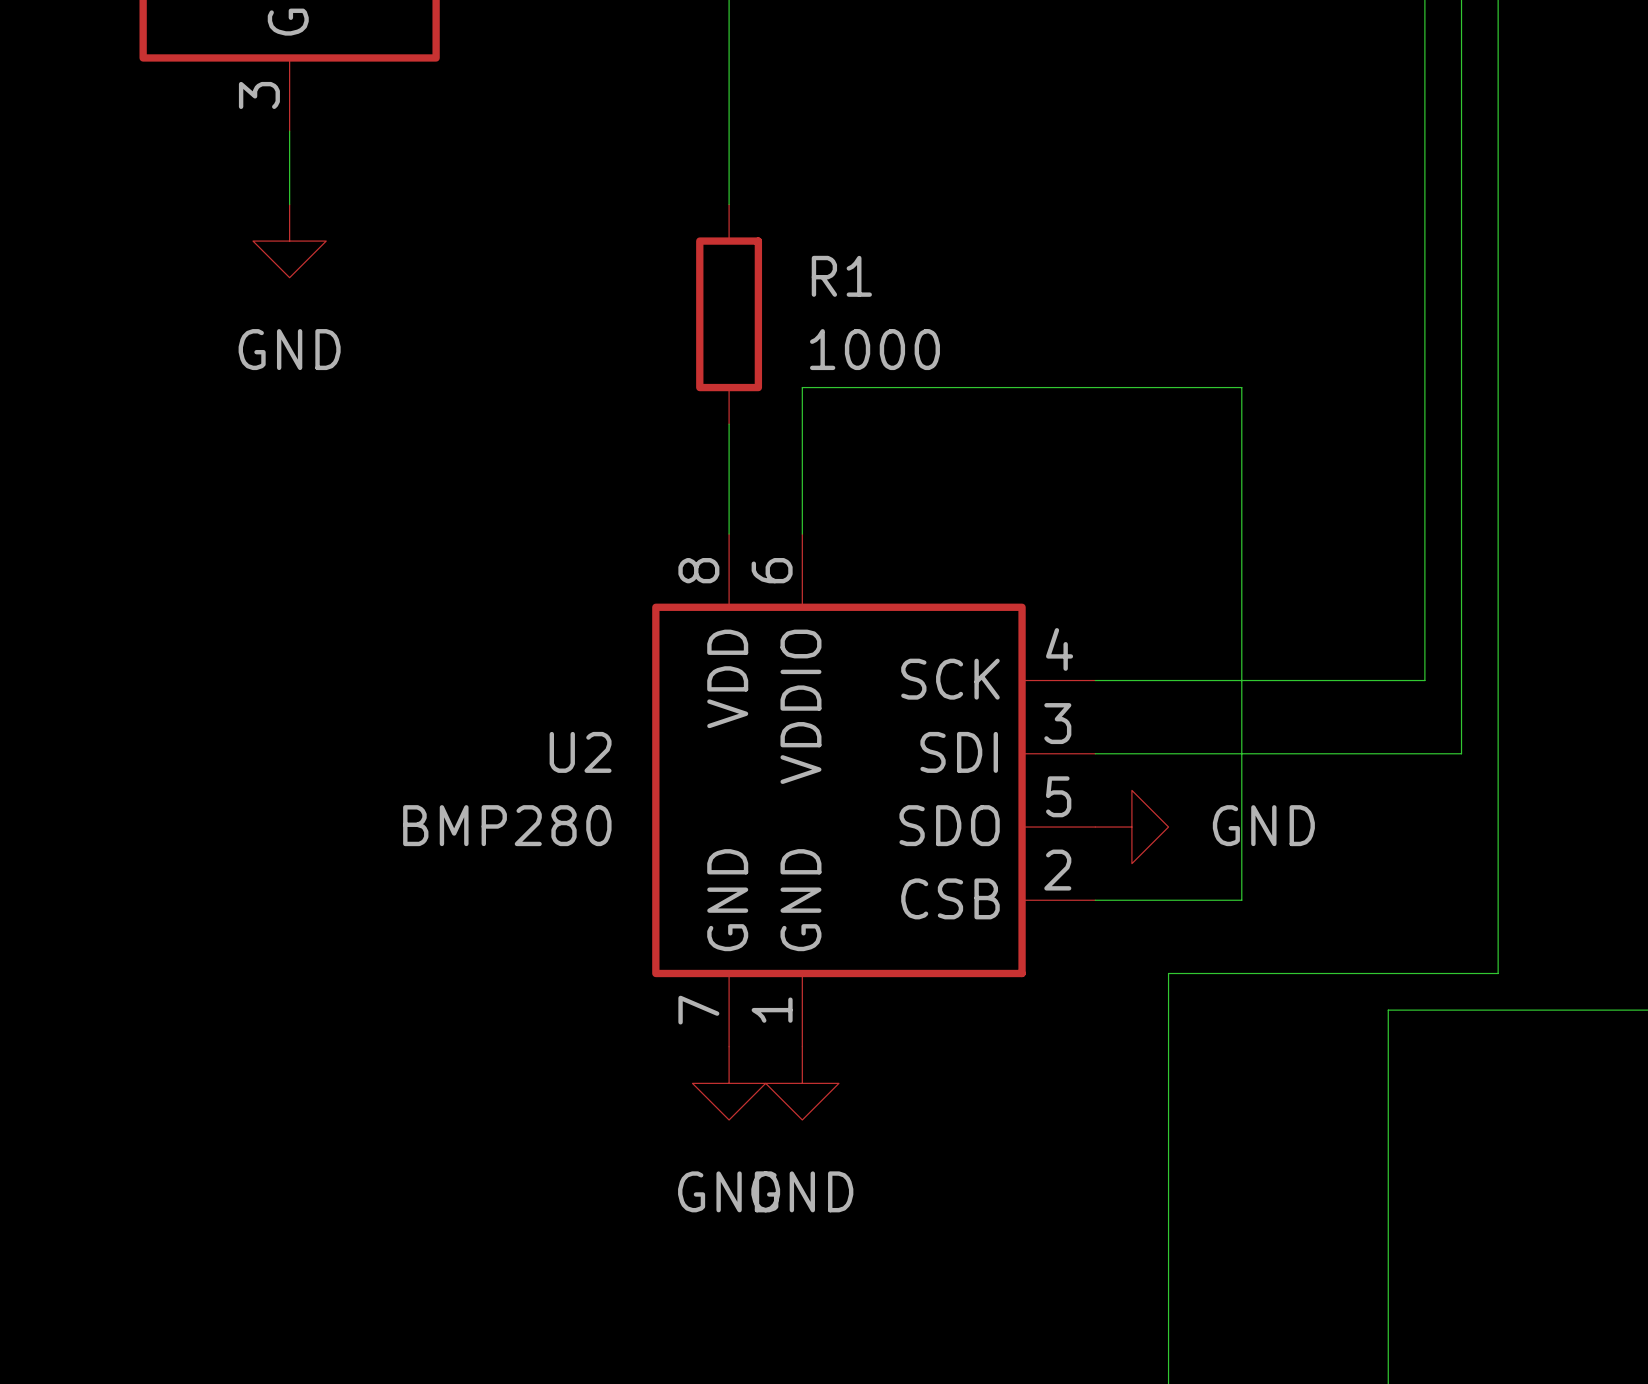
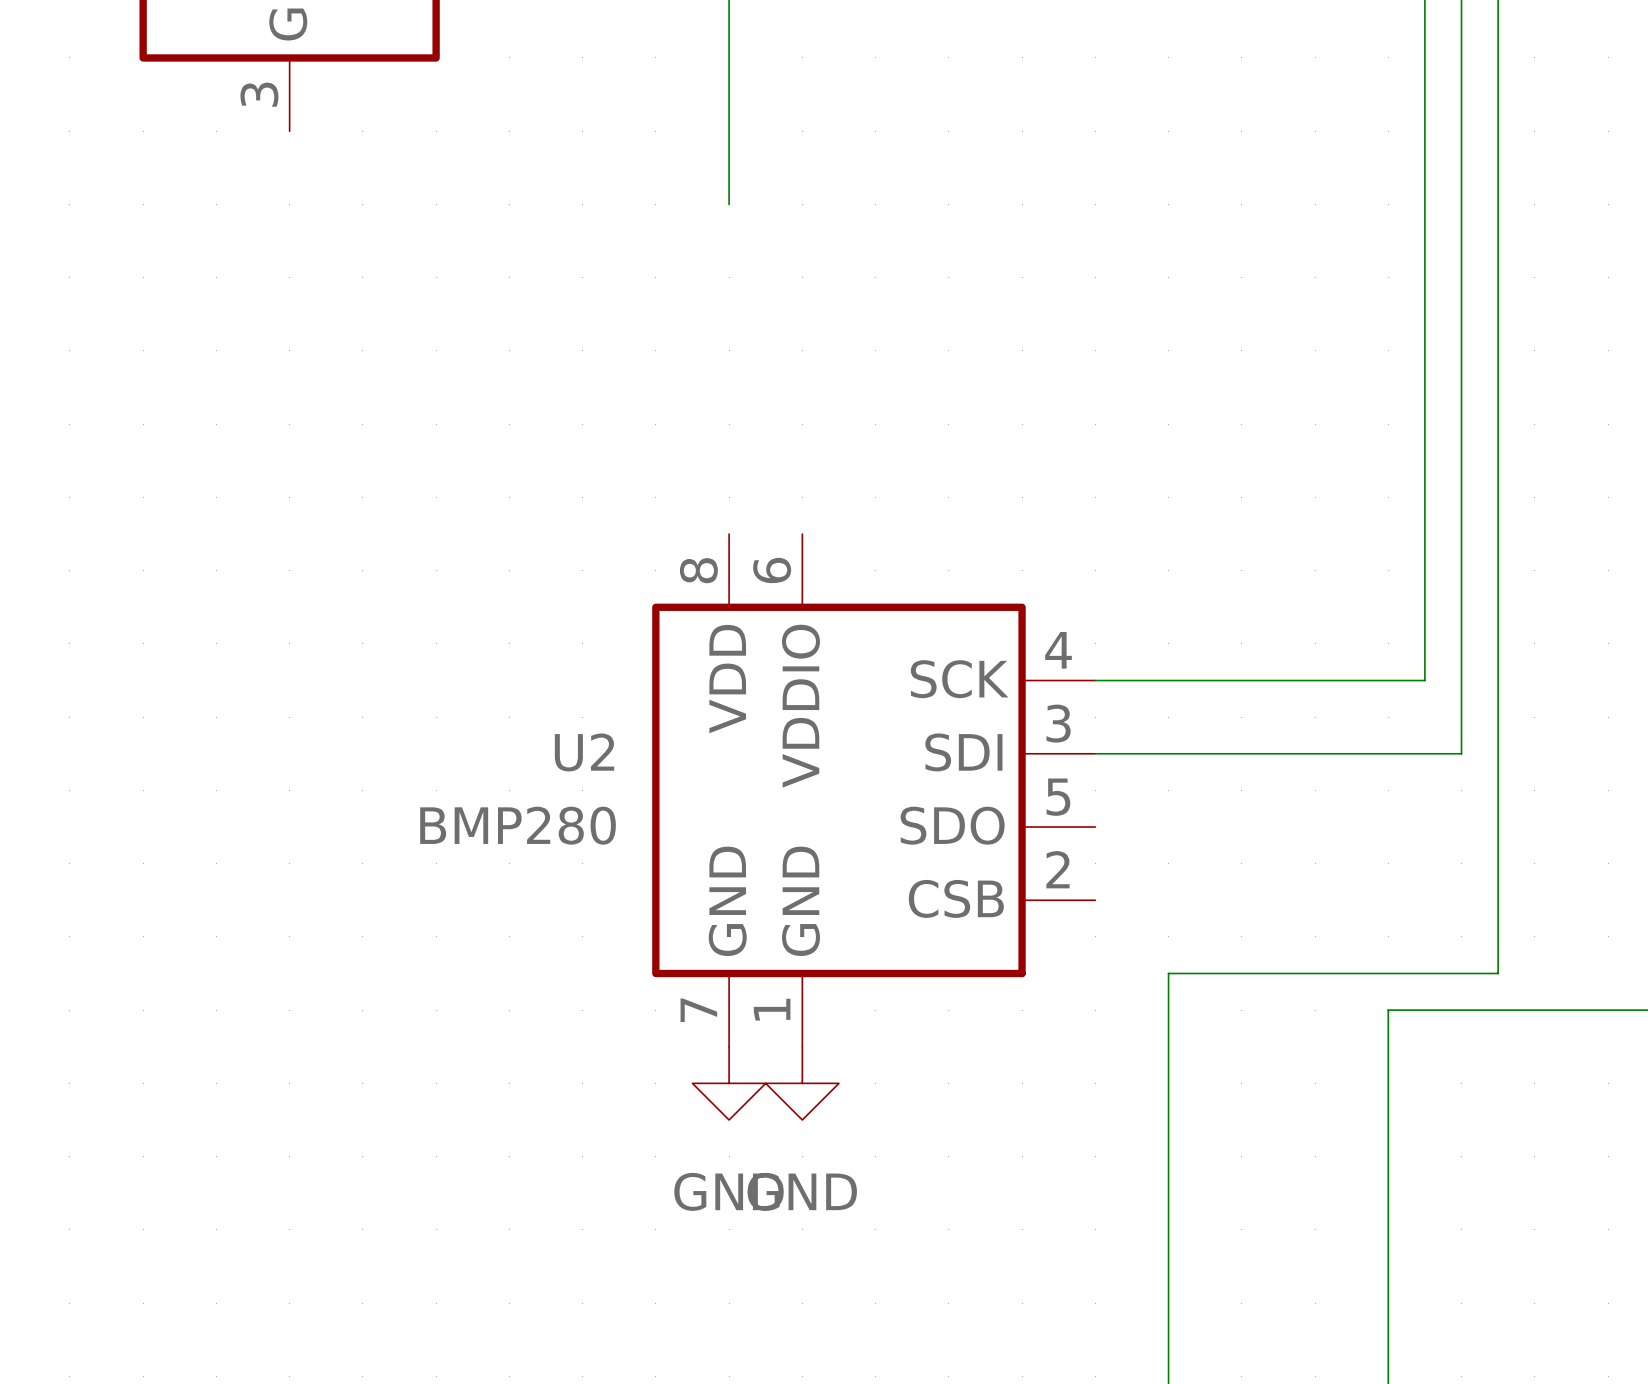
wire: (289, 131) (289, 204) -> none
power symbol: GND (289, 241) -> none
R1: 1000 (729, 314) -> none
wire: (729, 424) (729, 534) -> none
wire: (802, 534) (802, 387) (1241, 387) (1241, 900) (1095, 900) -> none
power symbol: GND (1131, 827) -> none

